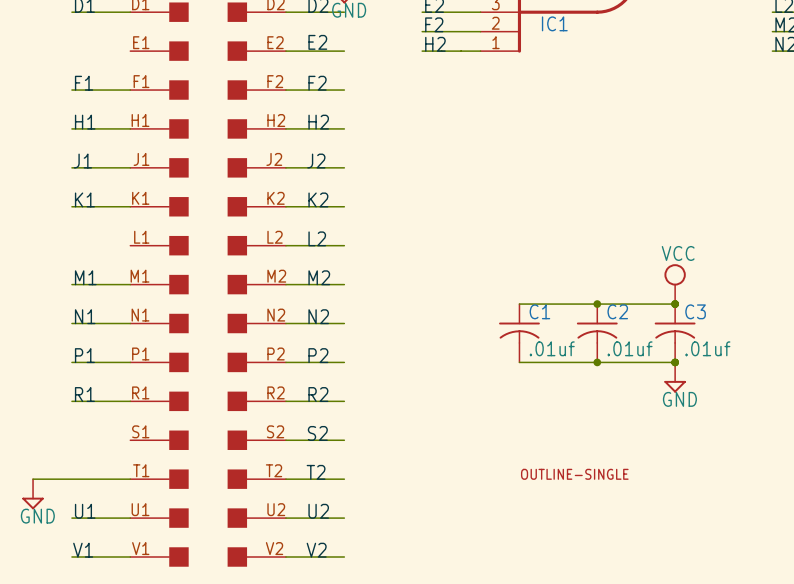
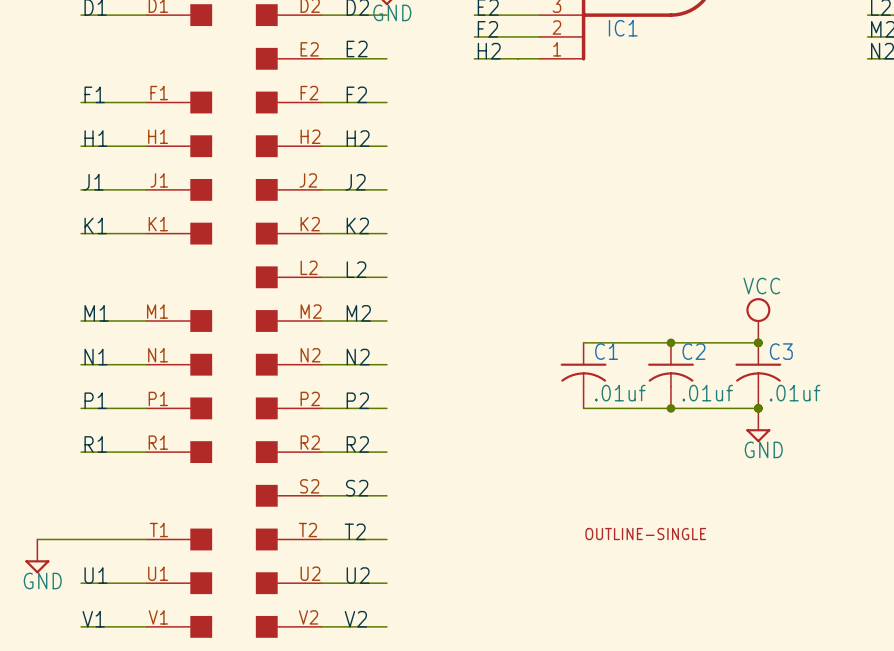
part: (159, 51) -> none
part: (159, 245) -> none
part: (159, 440) -> none

